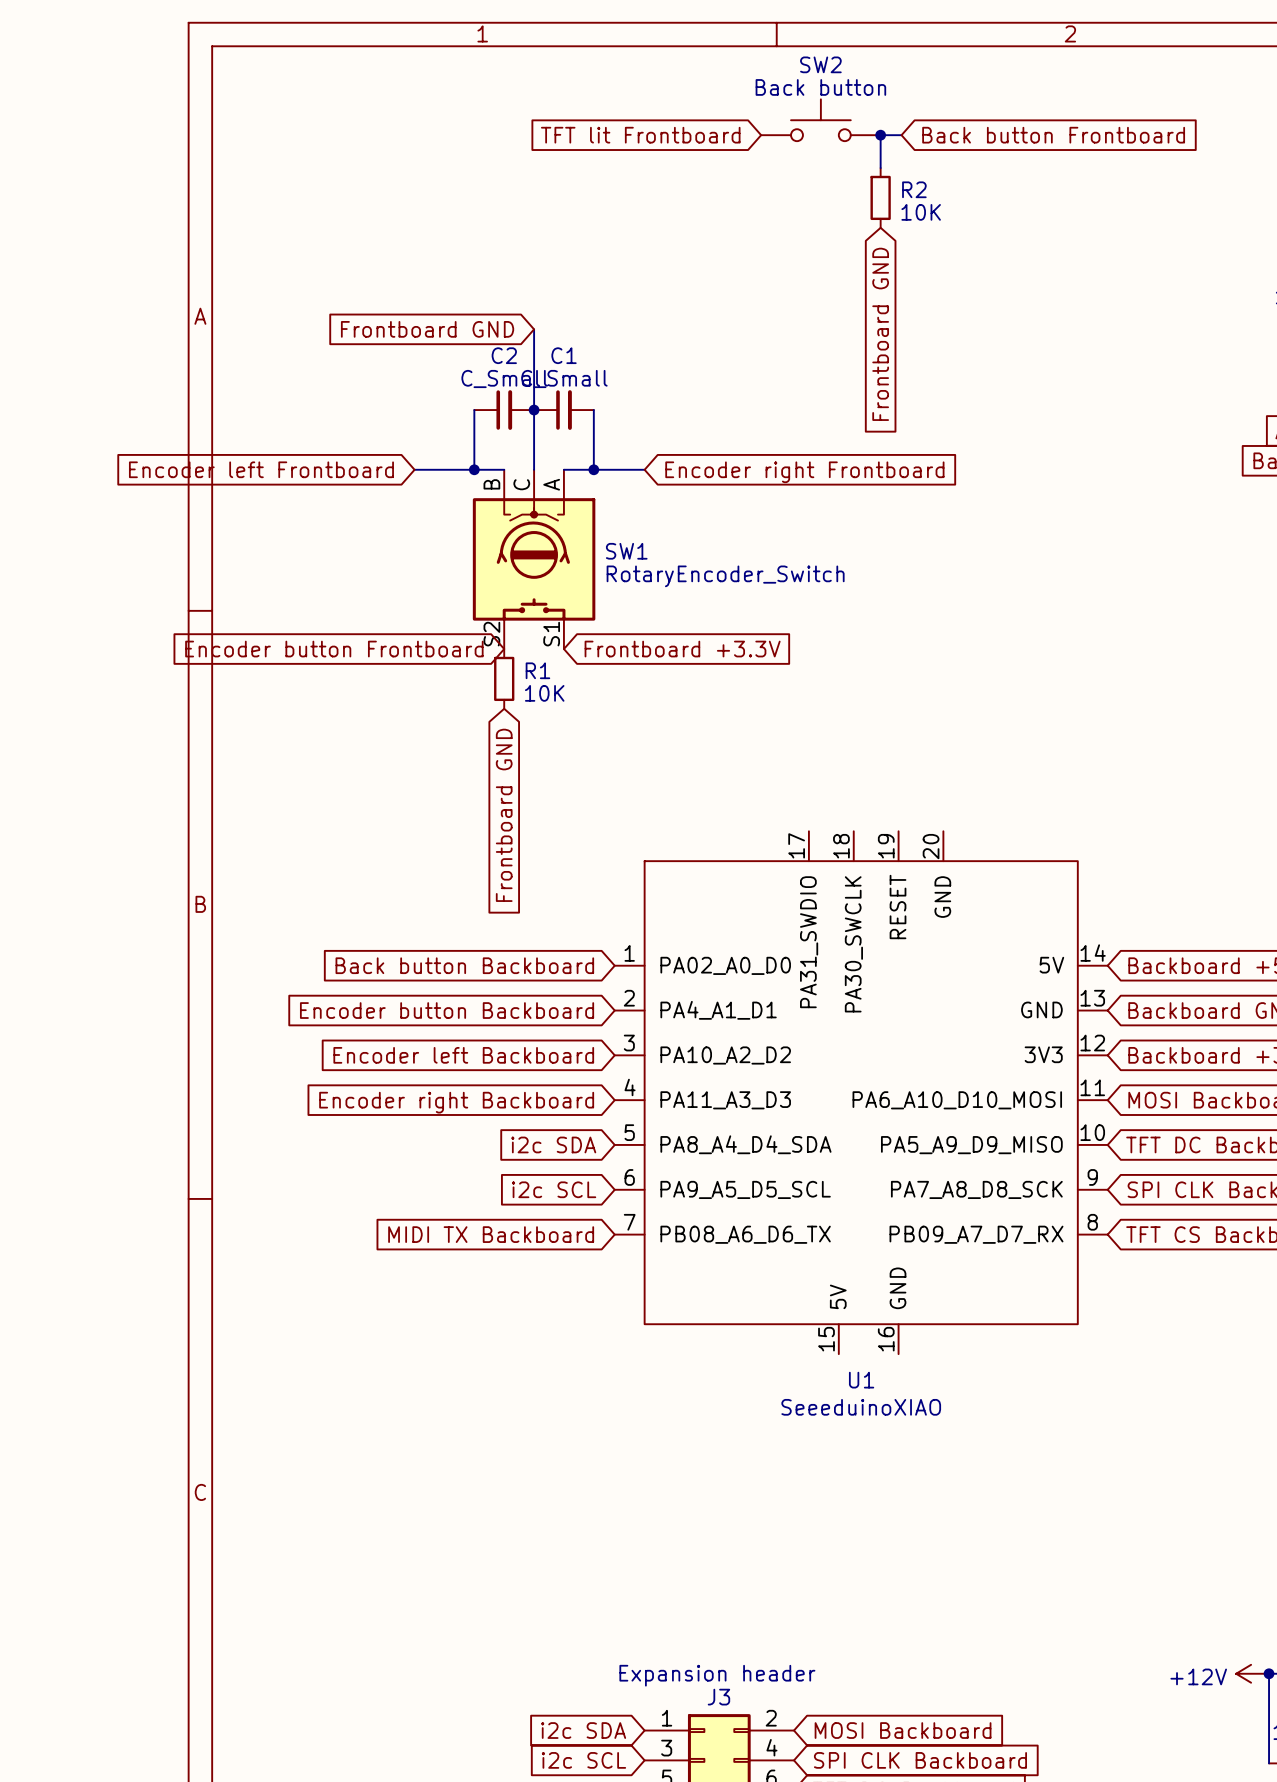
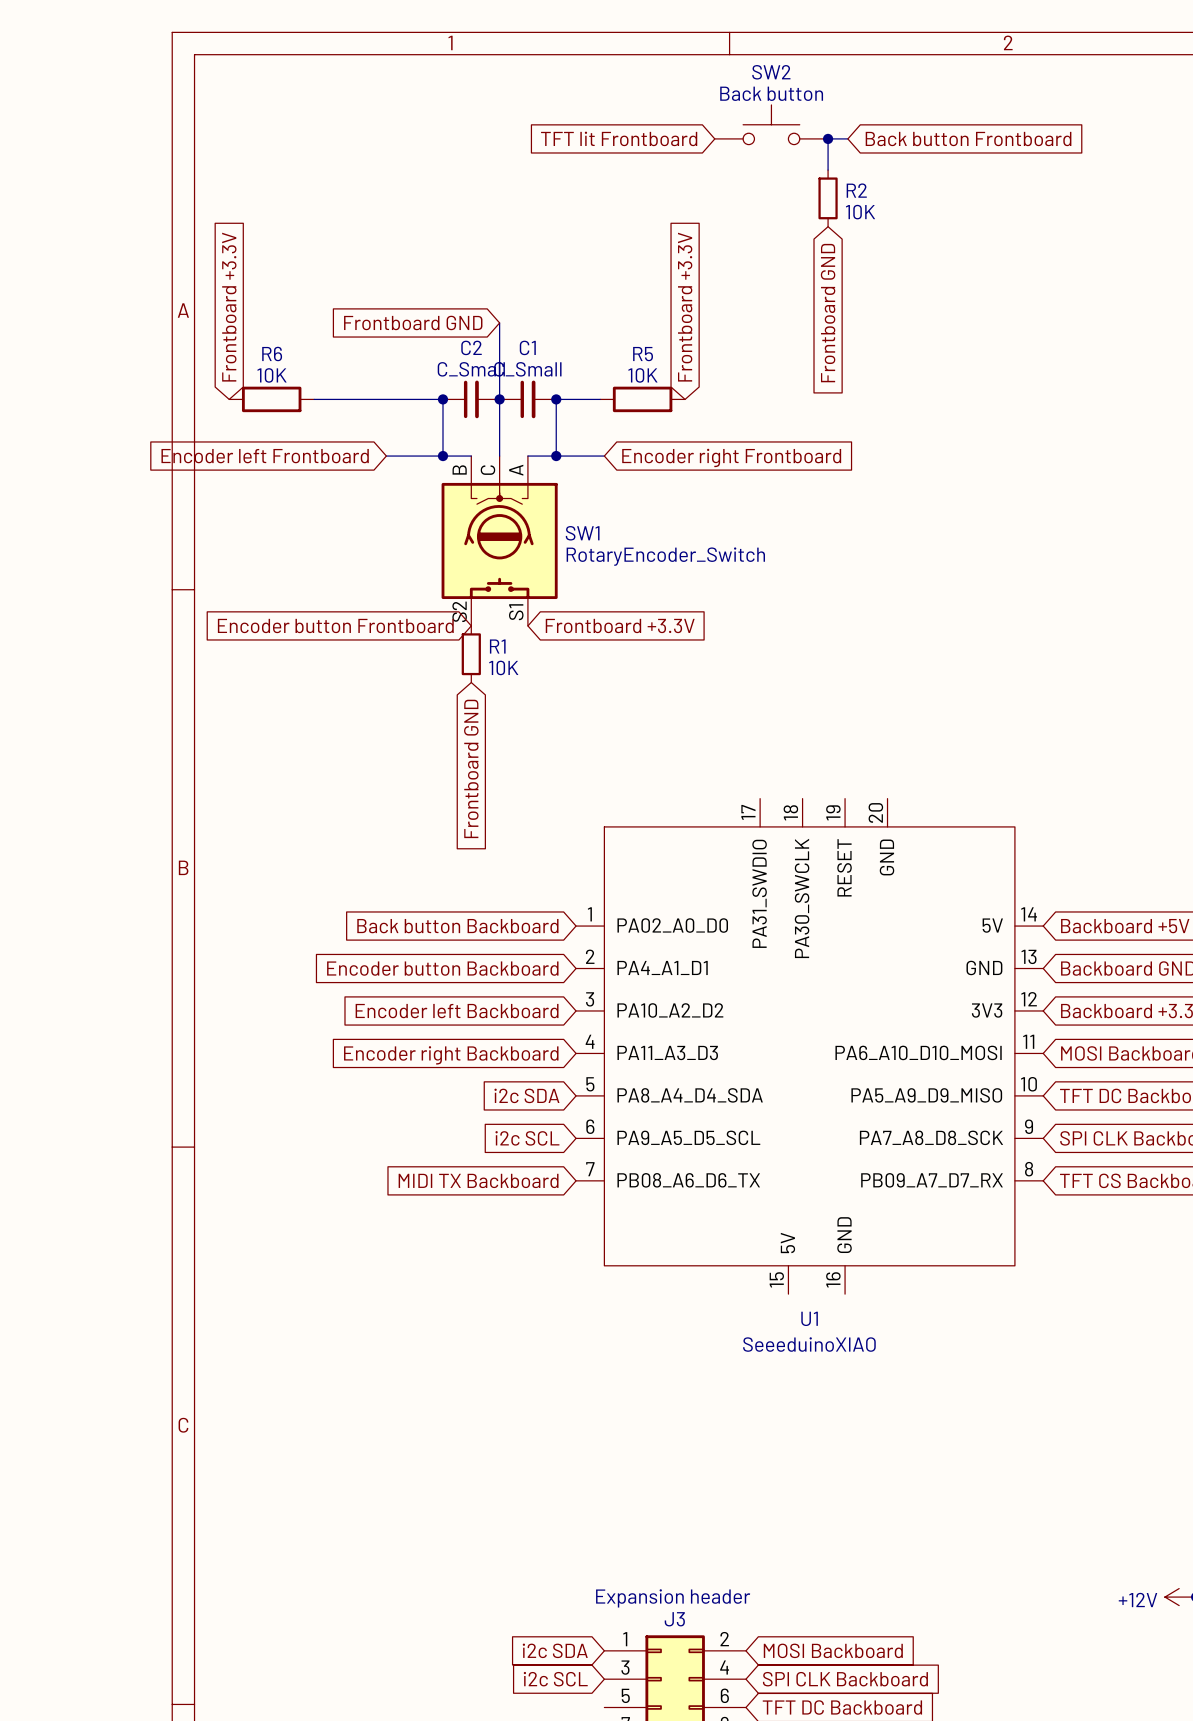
global label: none -> Frontboard +3.3V (229, 307)
global label: none -> Frontboard +3.3V (685, 307)
R6: none -> 10K (271, 399)
wire: none -> (314, 399) (442, 399)
junction: none -> (442, 399)
wire: none -> (556, 399) (600, 399)
junction: none -> (556, 399)
R5: none -> 10K (642, 399)

